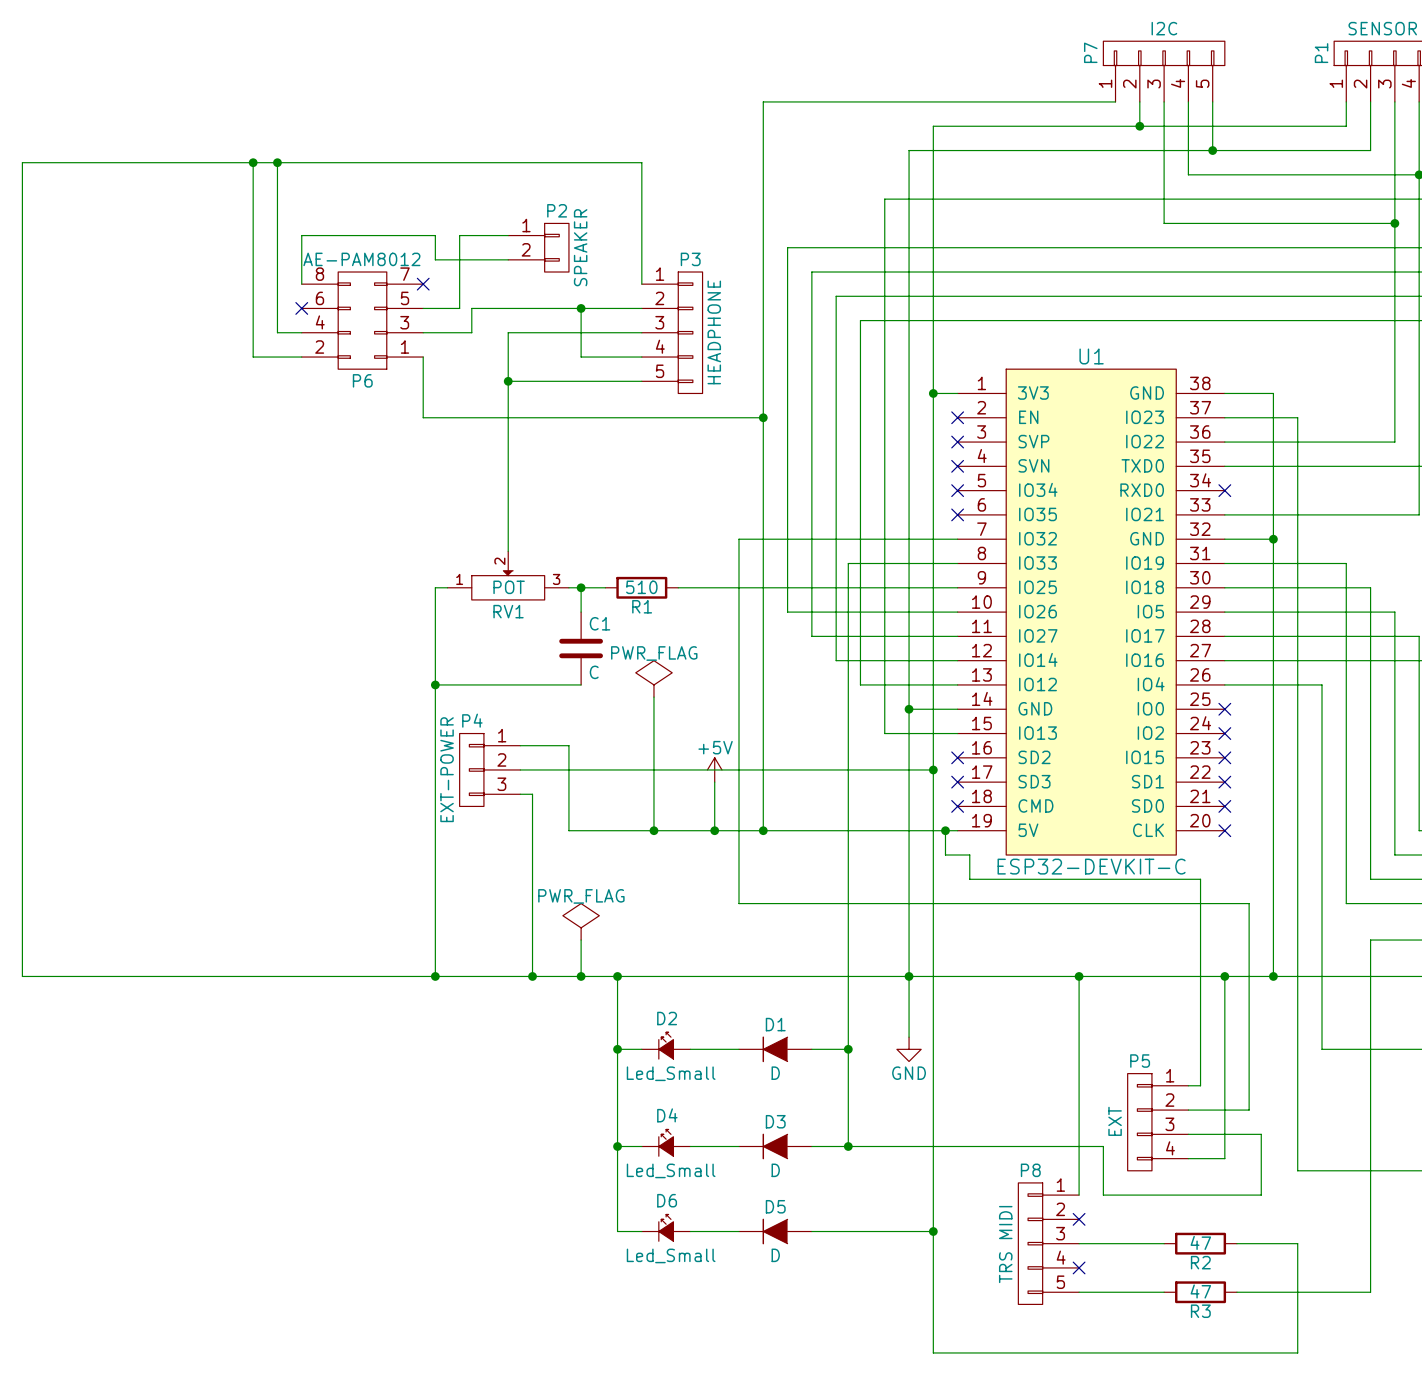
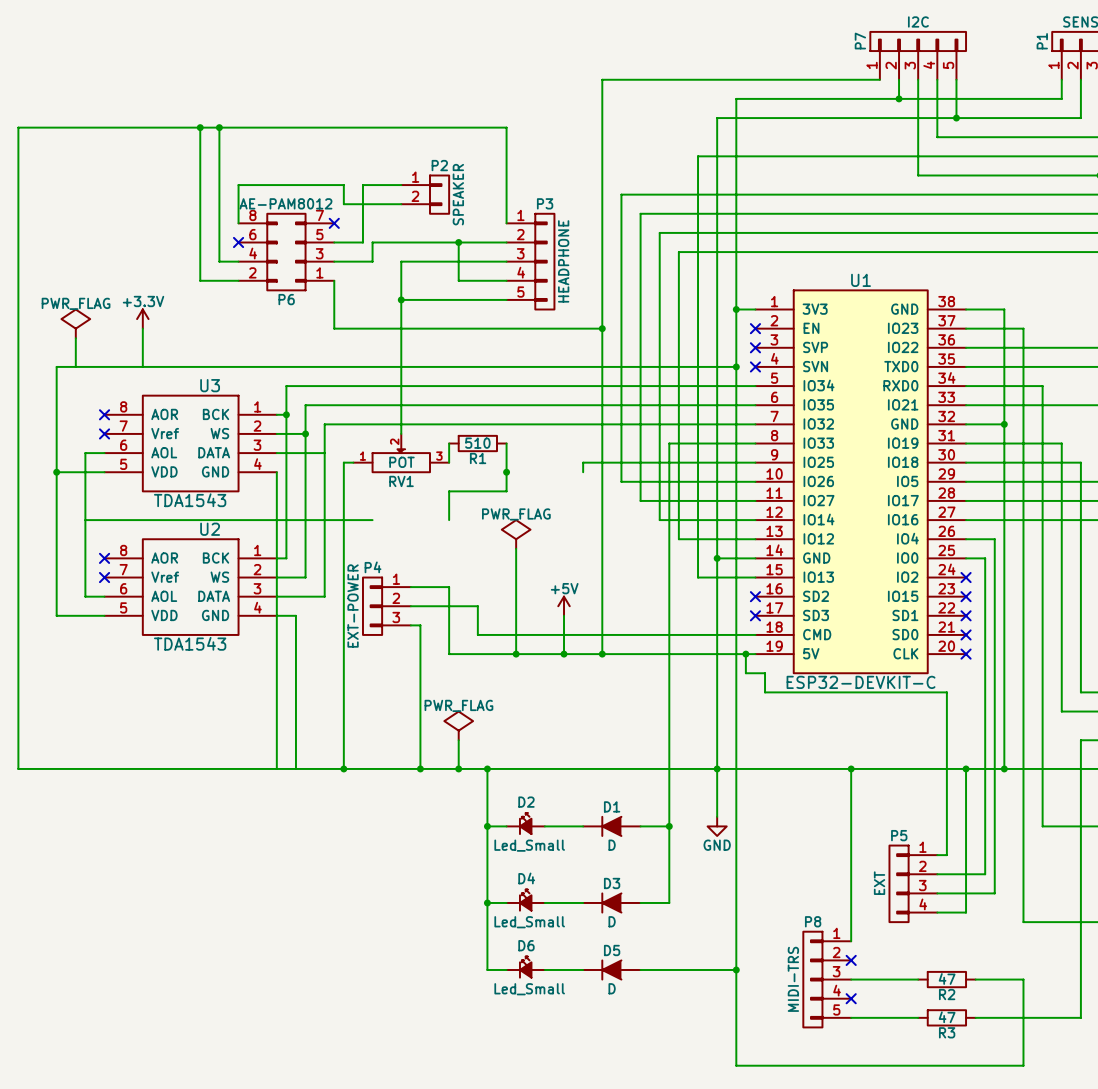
power symbol: none -> +3.3V (142, 319)
power symbol: none -> PWR_FLAG (75, 323)
wire: none -> (142, 328) (142, 366)
wire: none -> (75, 338) (75, 366)
wire: none -> (736, 366) (56, 366) (56, 615) (104, 615)
junction: none -> (736, 366)
wire: none -> (755, 386) (286, 386) (286, 558) (276, 558)
no-connect mark: (957, 490) -> none
no-connect mark: (1224, 490) -> none
wire: none -> (755, 405) (305, 405) (305, 577) (276, 577)
no-connect mark: (957, 514) -> none
no-connect mark: none -> (104, 414)
wire: none -> (276, 414) (286, 414)
junction: none -> (286, 414)
wire: (739, 539) (739, 587) (678, 587) -> (583, 424) (324, 424) (324, 596) (276, 596)
no-connect mark: none -> (104, 433)
wire: none -> (276, 433) (305, 433)
junction: none -> (305, 433)
U3: none -> TDA1543 (190, 443)
wire: none -> (506, 443) (506, 491) (449, 491) (449, 520)
wire: none -> (104, 453) (85, 453) (85, 596) (104, 596)
wire: none -> (276, 453) (324, 453)
wire: (568, 587) (605, 587) -> (449, 462) (449, 443)
wire: (581, 587) (581, 612) -> none
junction: (581, 587) -> none
R1 position: (641, 587) -> (477, 443)
wire: none -> (56, 472) (104, 472)
junction: none -> (56, 472)
wire: none -> (276, 472) (276, 768)
junction: none -> (506, 472)
wire: (739, 599) (739, 903) (1249, 903) -> (966, 558) (985, 558) (985, 711)
C1: C (581, 648) -> none
wire: none -> (85, 520) (372, 520)
wire: (435, 684) (581, 684) -> none
junction: (435, 684) -> none
wire: (1261, 684) (1322, 684) -> (966, 386) (1042, 386) (1042, 539)
no-connect mark: none -> (104, 558)
no-connect mark: (1224, 709) -> none
no-connect mark: none -> (104, 577)
U2: none -> TDA1543 (190, 587)
wire: (605, 769) (933, 769) -> (477, 606) (477, 634) (755, 634)
junction: (933, 769) -> none
wire: none -> (276, 615) (295, 615) (295, 768)
no-connect mark: (957, 806) -> none
wire: (1261, 1134) (1261, 1195) (1103, 1195) (1103, 1146) (848, 1146) -> (994, 893) (994, 539)
junction: (848, 1146) -> none
P8 value: TRS MIDI (1005, 1244) -> MIDI-TRS (793, 979)

